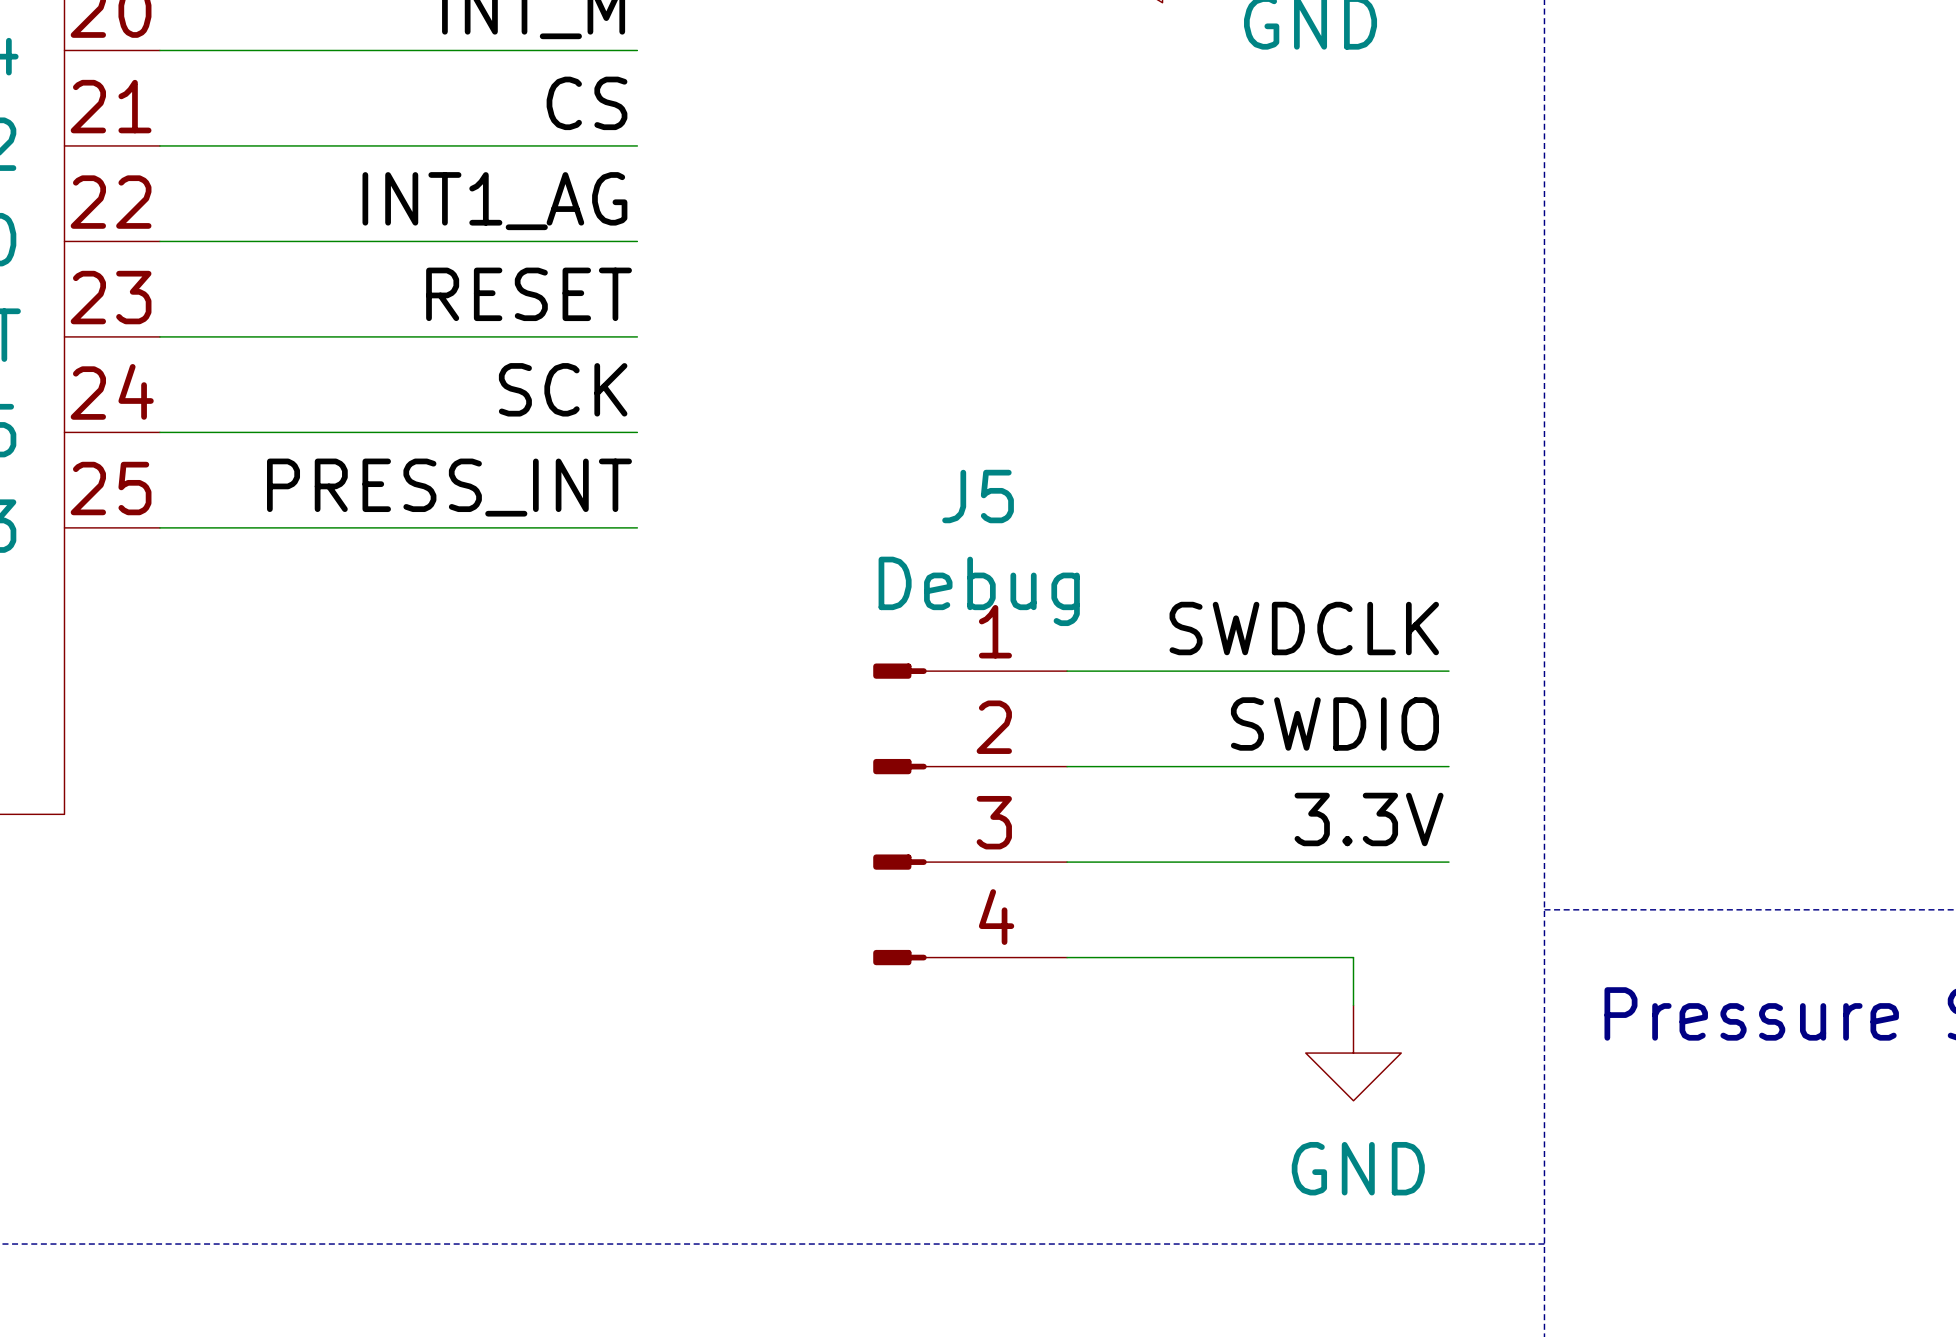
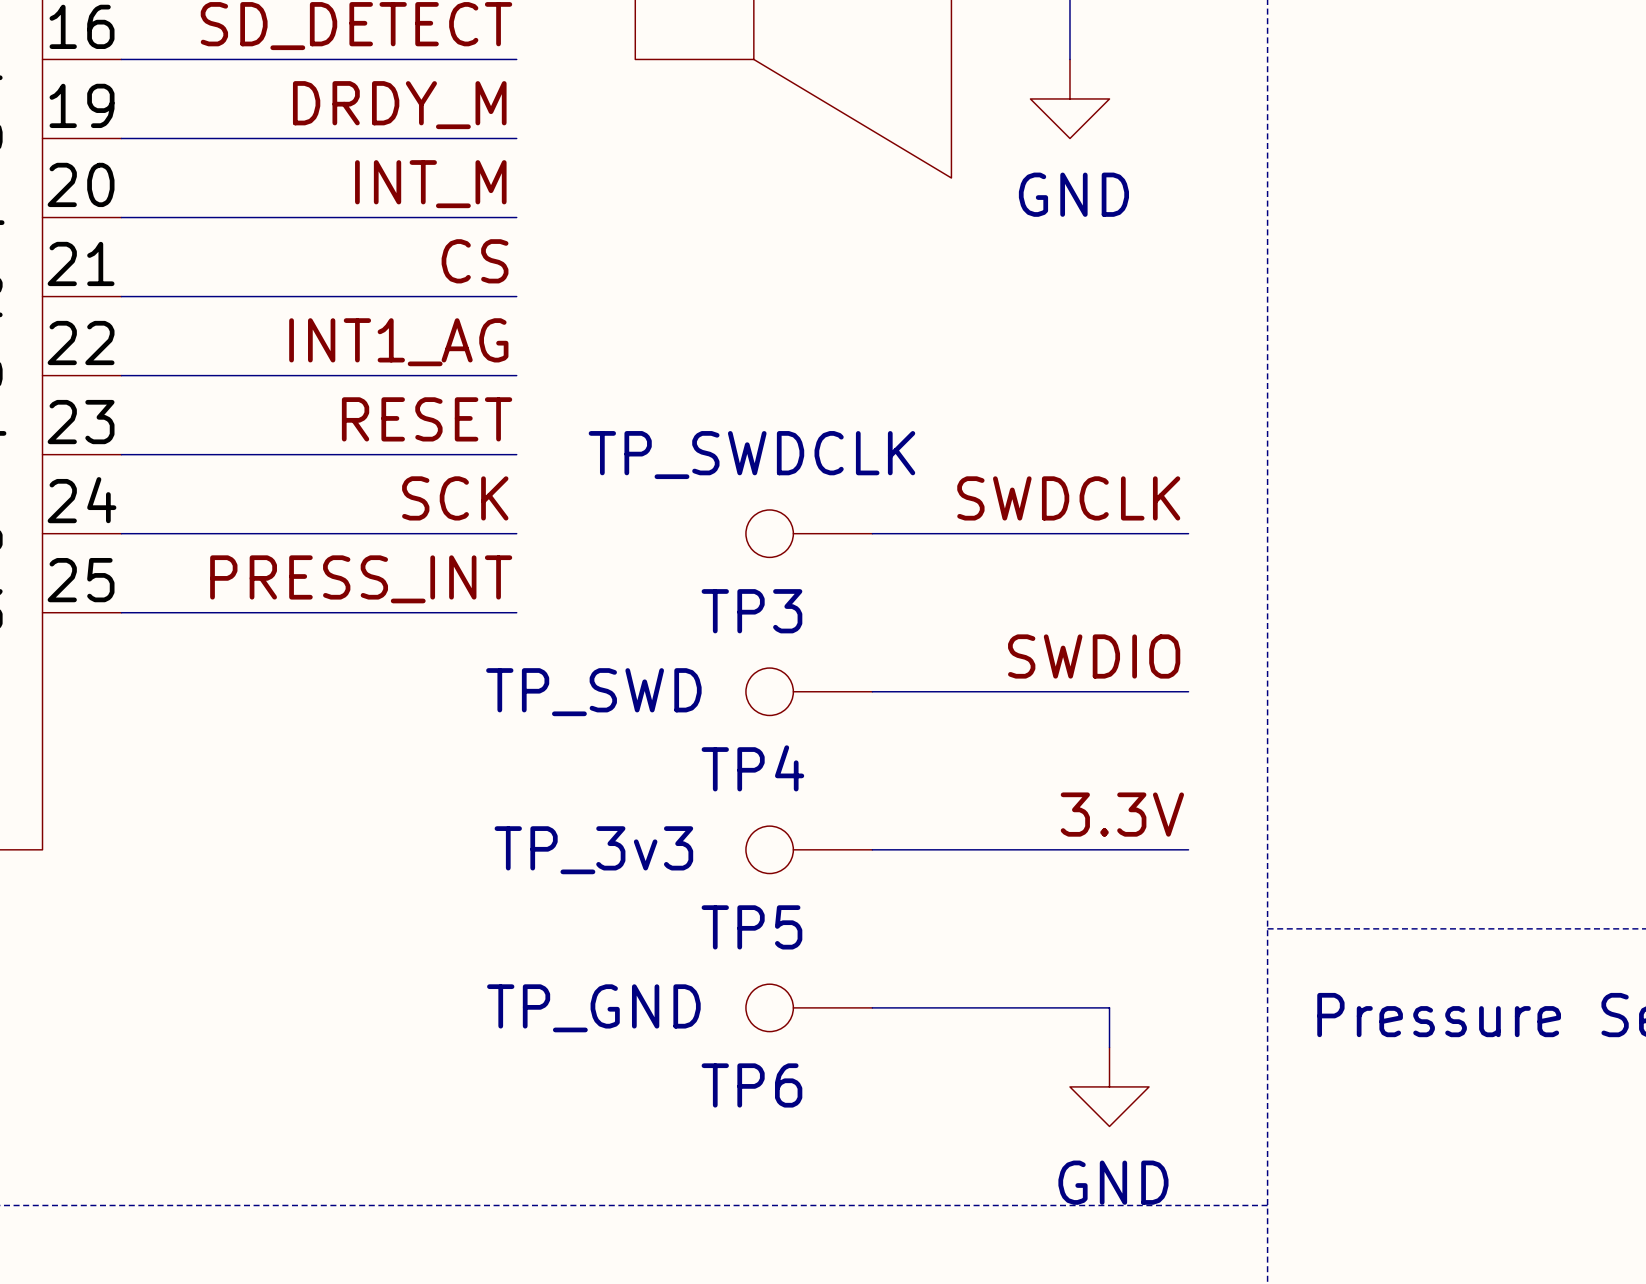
TP3: none -> TP_SWDCLK (809, 533)
TP4: none -> TP_SWD (809, 691)
label position: SWDCLK (1304, 628) -> SWDCLK (1068, 498)
wire: (1067, 671) (1448, 671) -> (872, 691) (1188, 691)
label position: SWDIO (1334, 724) -> SWDIO (1094, 656)
wire: (1067, 766) (1448, 766) -> (872, 849) (1188, 849)
J5: Debug (970, 814) -> none
TP5: none -> TP_3v3 (809, 849)
label position: 3.3V (1369, 819) -> 3.3V (1122, 814)
wire: (1067, 862) (1448, 862) -> (872, 533) (1188, 533)
wire: (1067, 957) (1353, 957) (1353, 1005) -> (872, 1007) (1109, 1007) (1109, 1047)
TP6: none -> TP_GND (809, 1007)
power symbol position: GND (1353, 1053) -> GND (1109, 1086)

